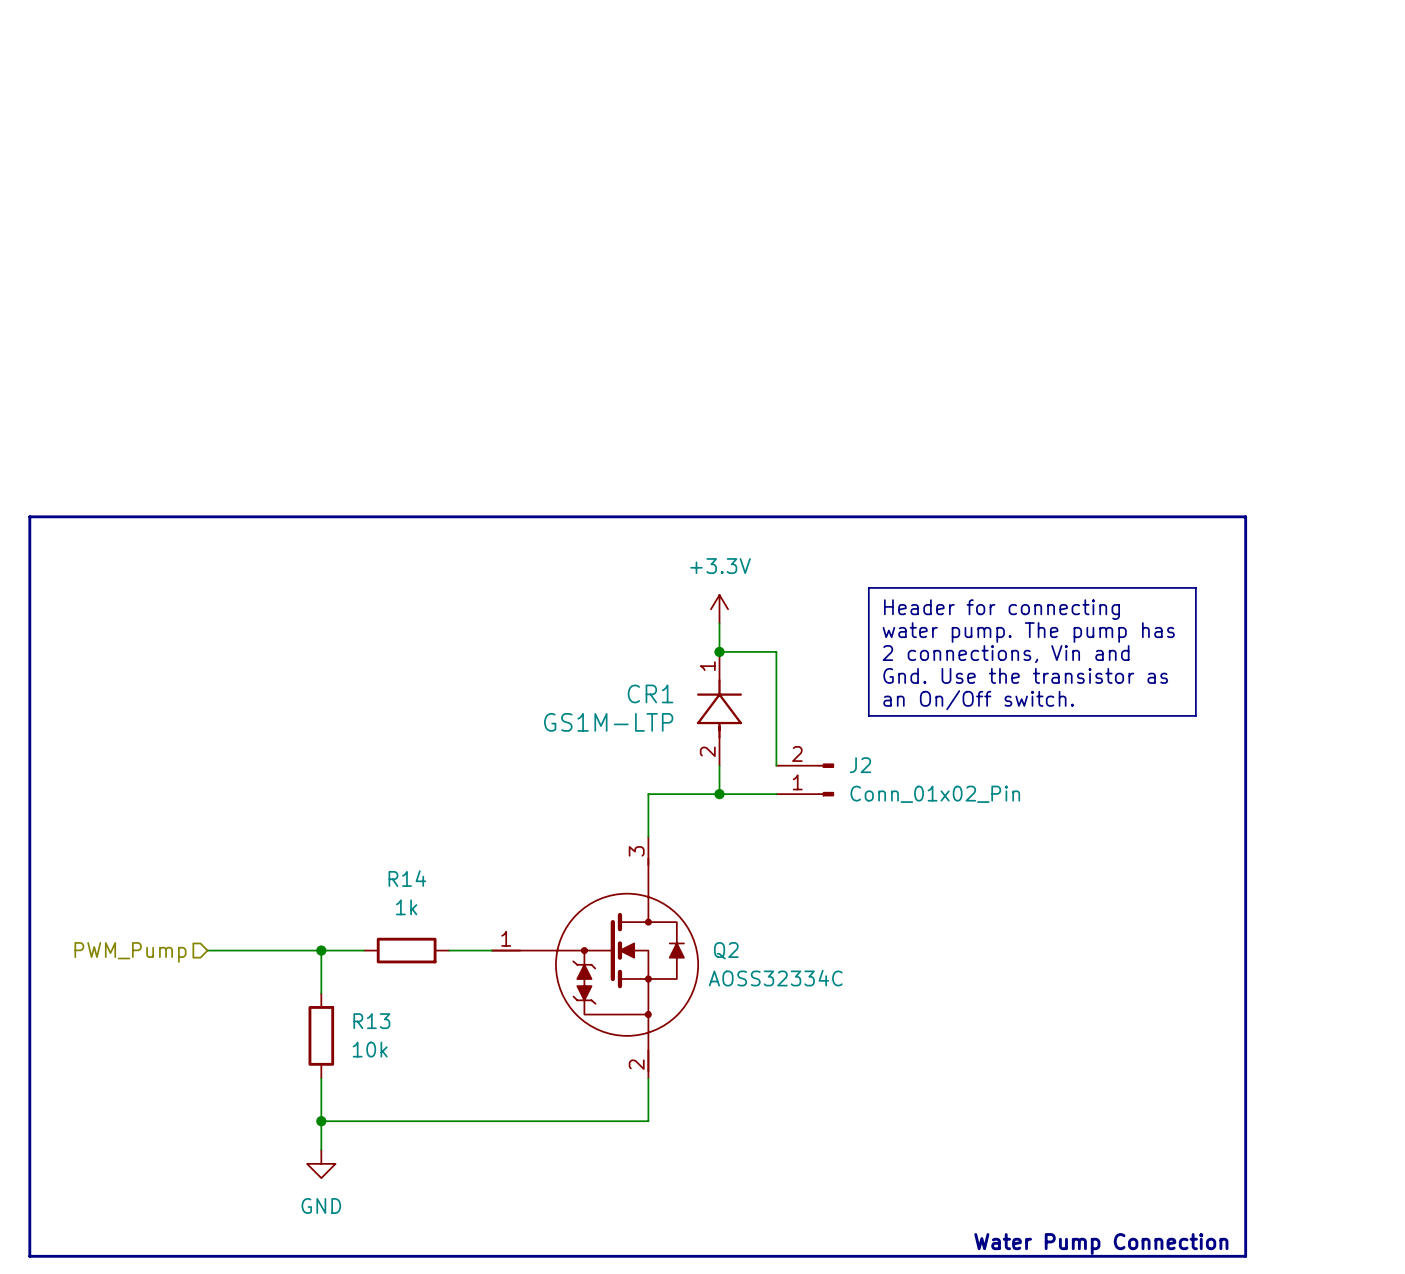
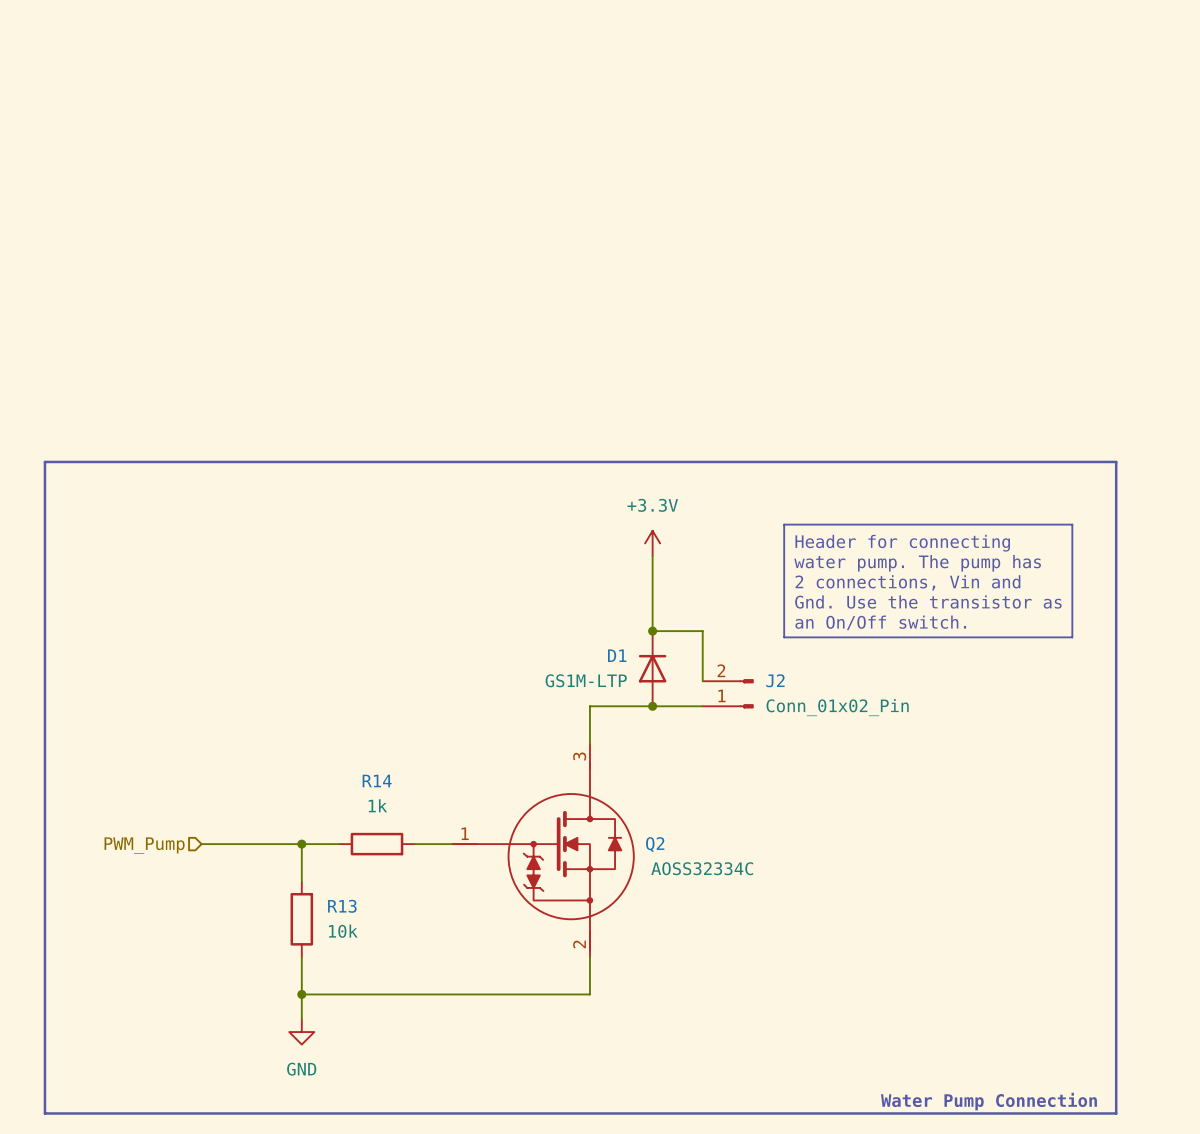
wire: (719, 651) (776, 651) (776, 708) -> (652, 581) (652, 631) (702, 631)
junction position: (719, 651) -> (652, 631)
CR1: GS1M-LTP (719, 708) -> none
D1: none -> GS1M-LTP (652, 668)

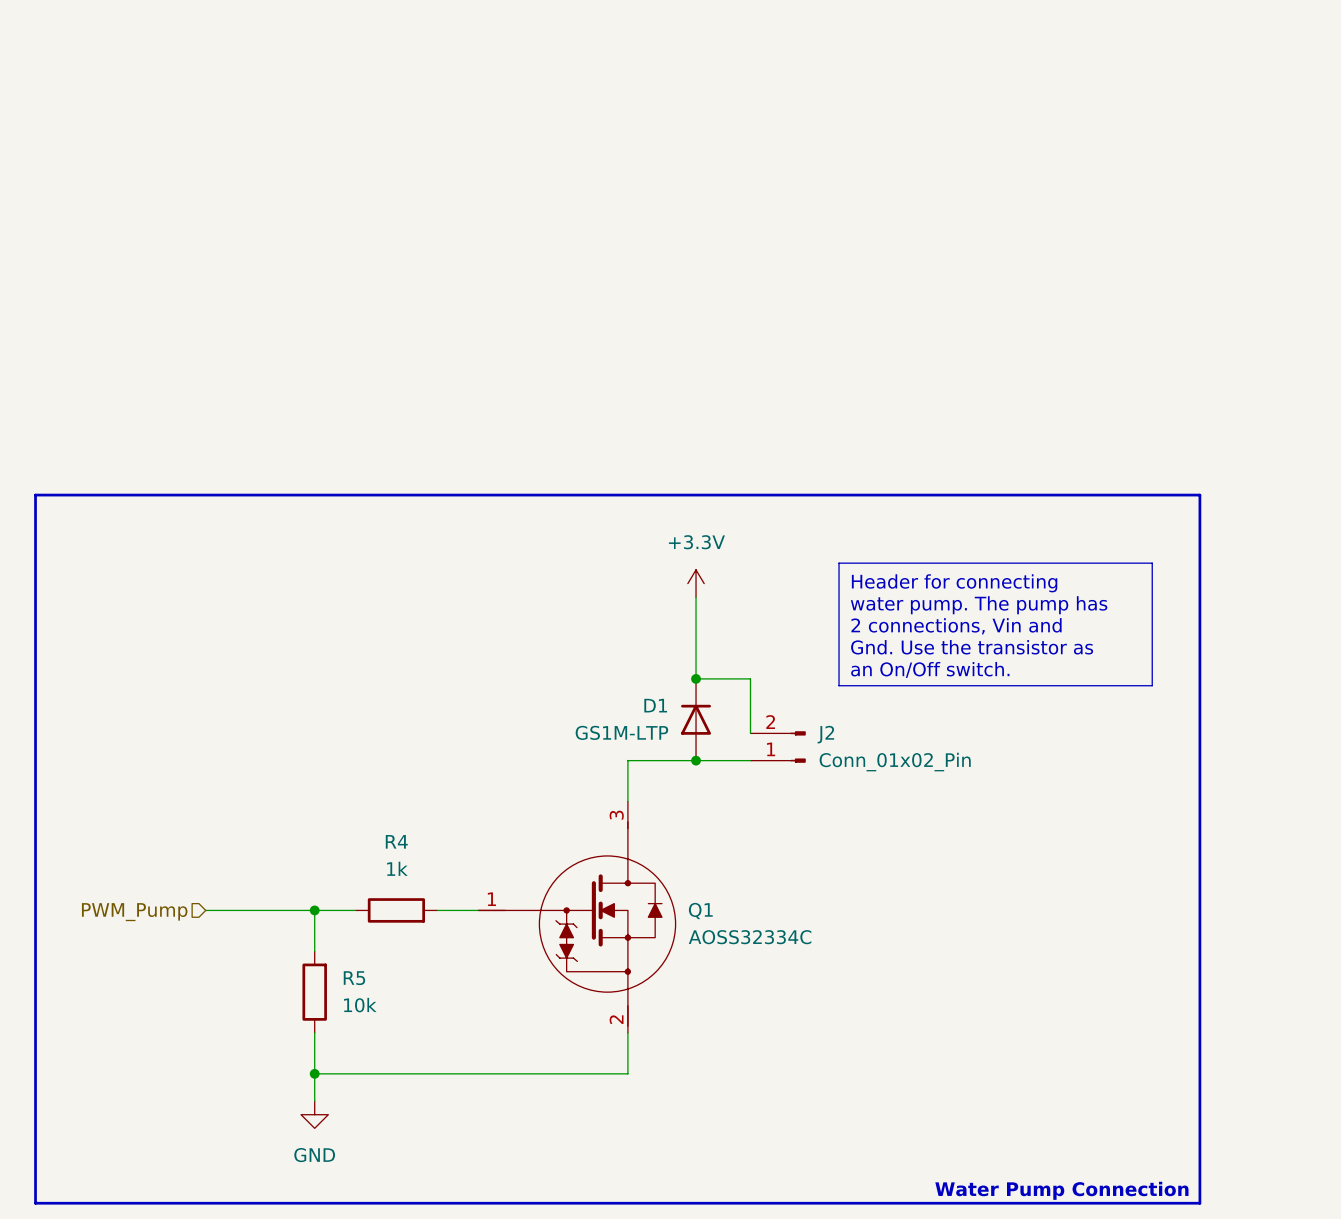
R14 name: R14 (377, 780) -> R4 (396, 841)
Q2 name: Q2 (655, 844) -> Q1 (700, 911)
R13 name: R13 (342, 906) -> R5 (354, 978)

